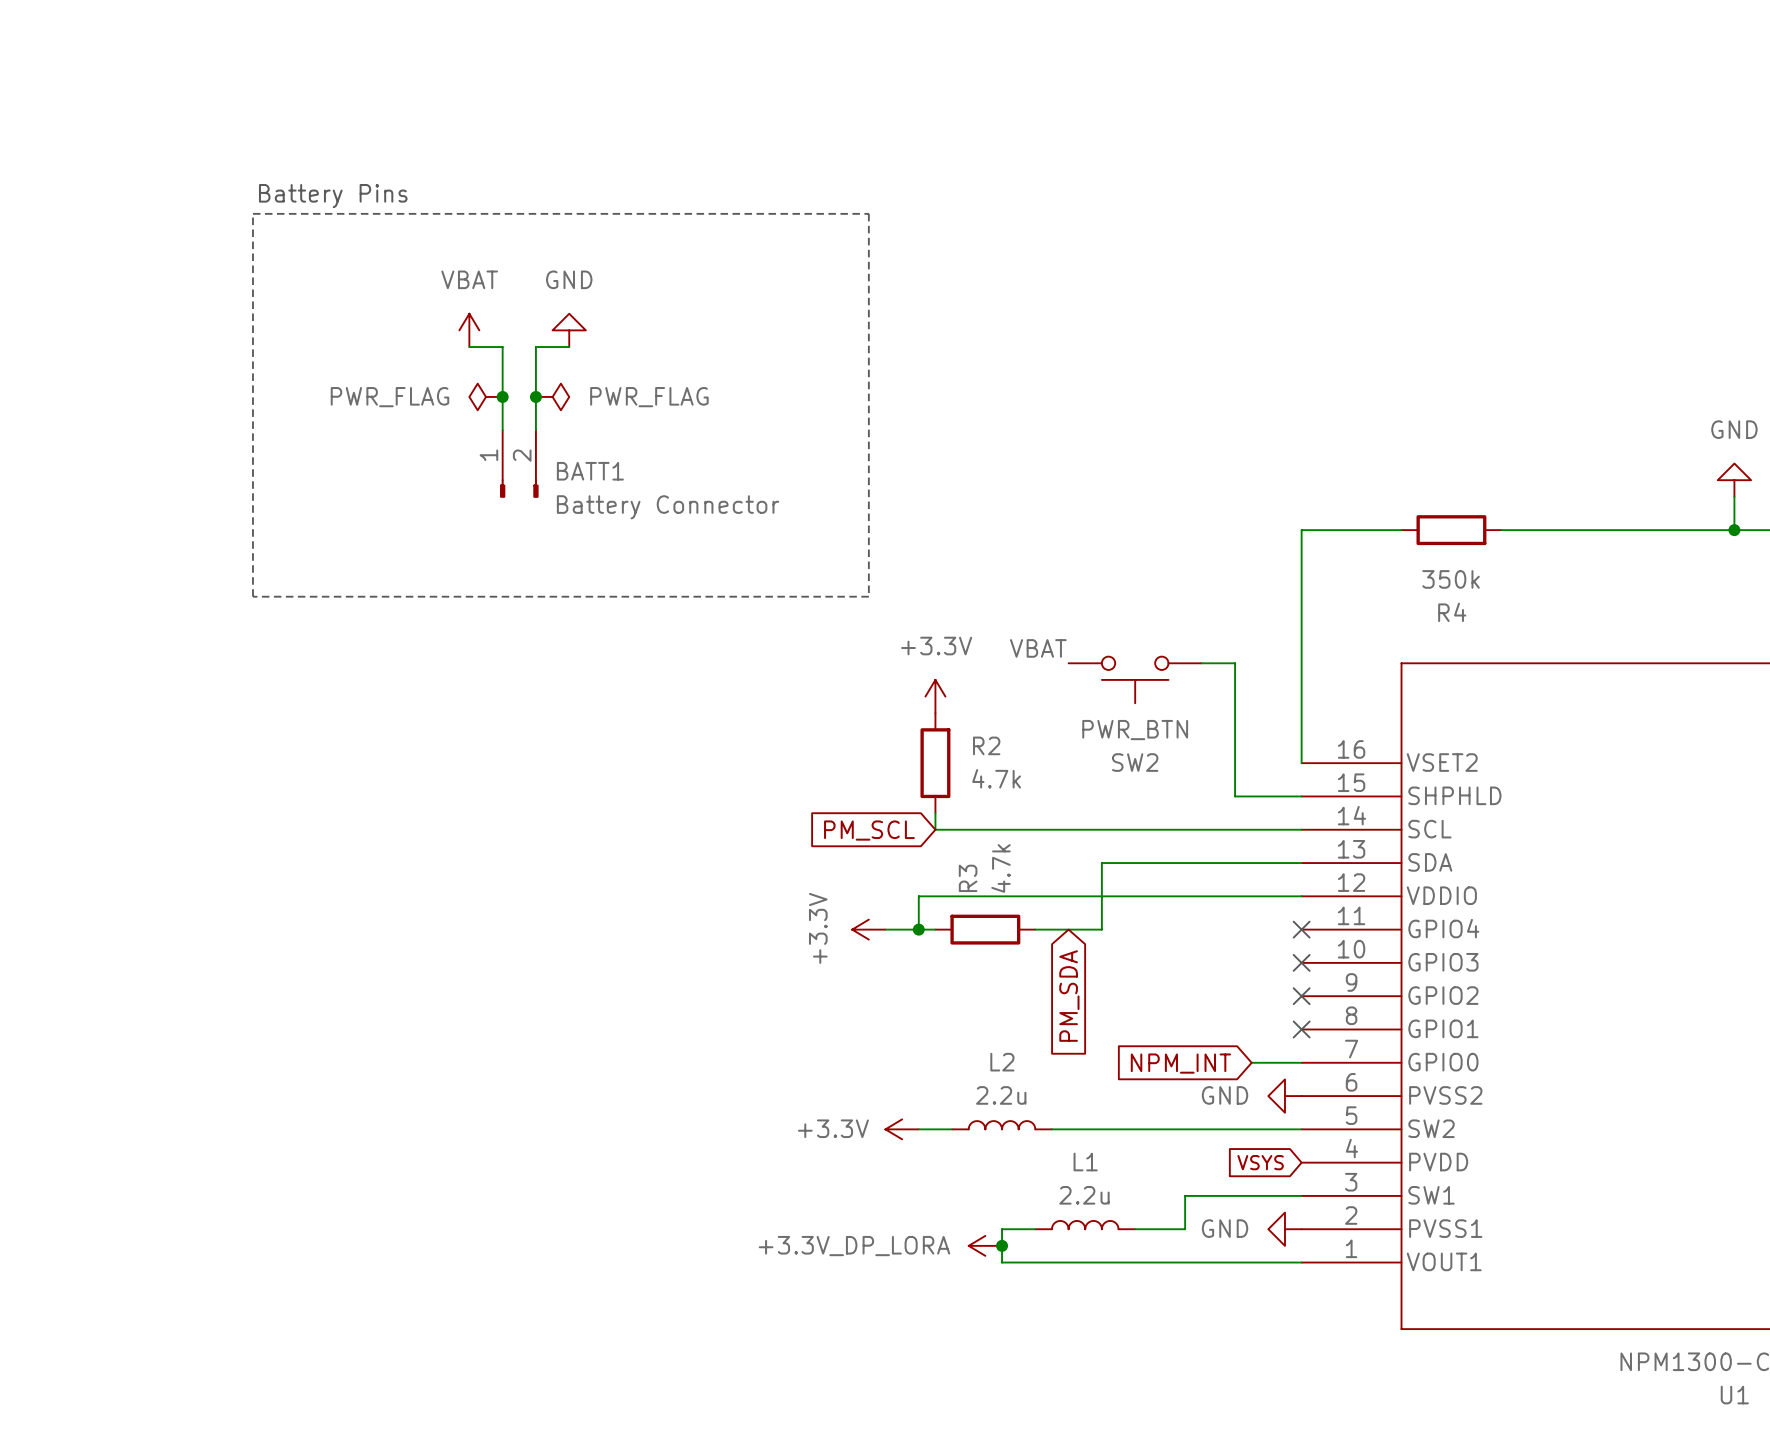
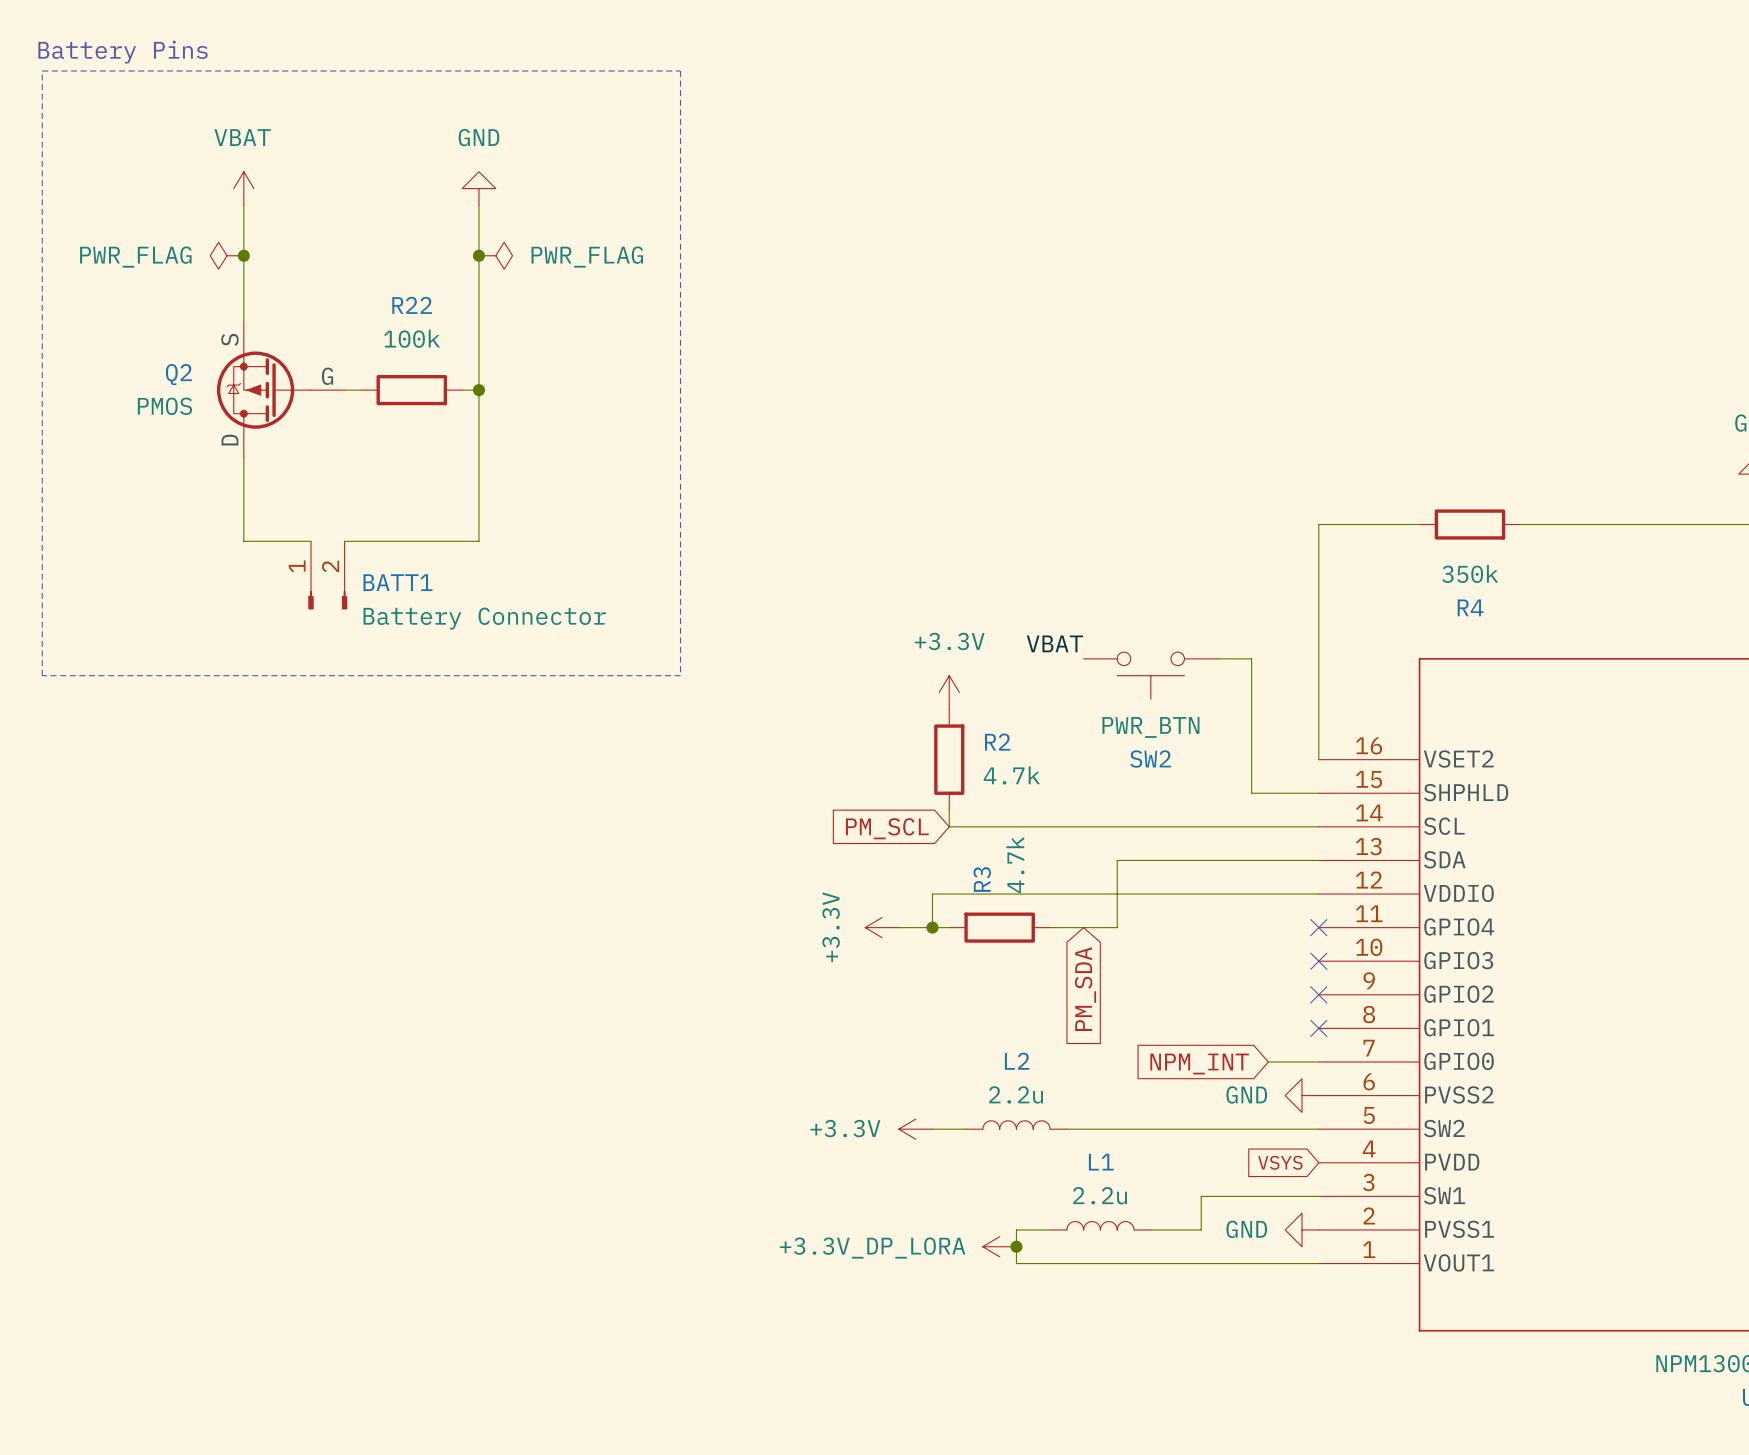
line: none -> (42, 71) (680, 71) (680, 675) (42, 675) (42, 71)
text position: Battery Pins (333, 196) -> Battery Pins (123, 52)
wire: none -> (243, 205) (243, 322)
line: (252, 213) (868, 213) (868, 596) (252, 596) (252, 213) -> none
wire: none -> (478, 205) (478, 541) (344, 541)
power symbol: none -> PWR_FLAG (227, 255)
junction: none -> (243, 255)
junction: none -> (478, 255)
power symbol: none -> PWR_FLAG (495, 255)
power symbol position: VBAT (469, 330) -> VBAT (243, 188)
power symbol position: GND (569, 330) -> GND (478, 188)
wire: (469, 347) (502, 347) (502, 430) -> none
wire: (569, 347) (535, 347) (535, 430) -> none
Q2: none -> PMOS (280, 390)
wire: none -> (344, 390) (361, 390)
R22: none -> 100k (411, 390)
wire: none -> (462, 390) (478, 390)
junction: none -> (478, 390)
power symbol: PWR_FLAG (486, 396) -> none
junction: (502, 396) -> none
junction: (535, 396) -> none
power symbol: PWR_FLAG (552, 396) -> none
wire: none -> (243, 457) (243, 541) (311, 541)
BATT1 position: (519, 464) -> (327, 575)

